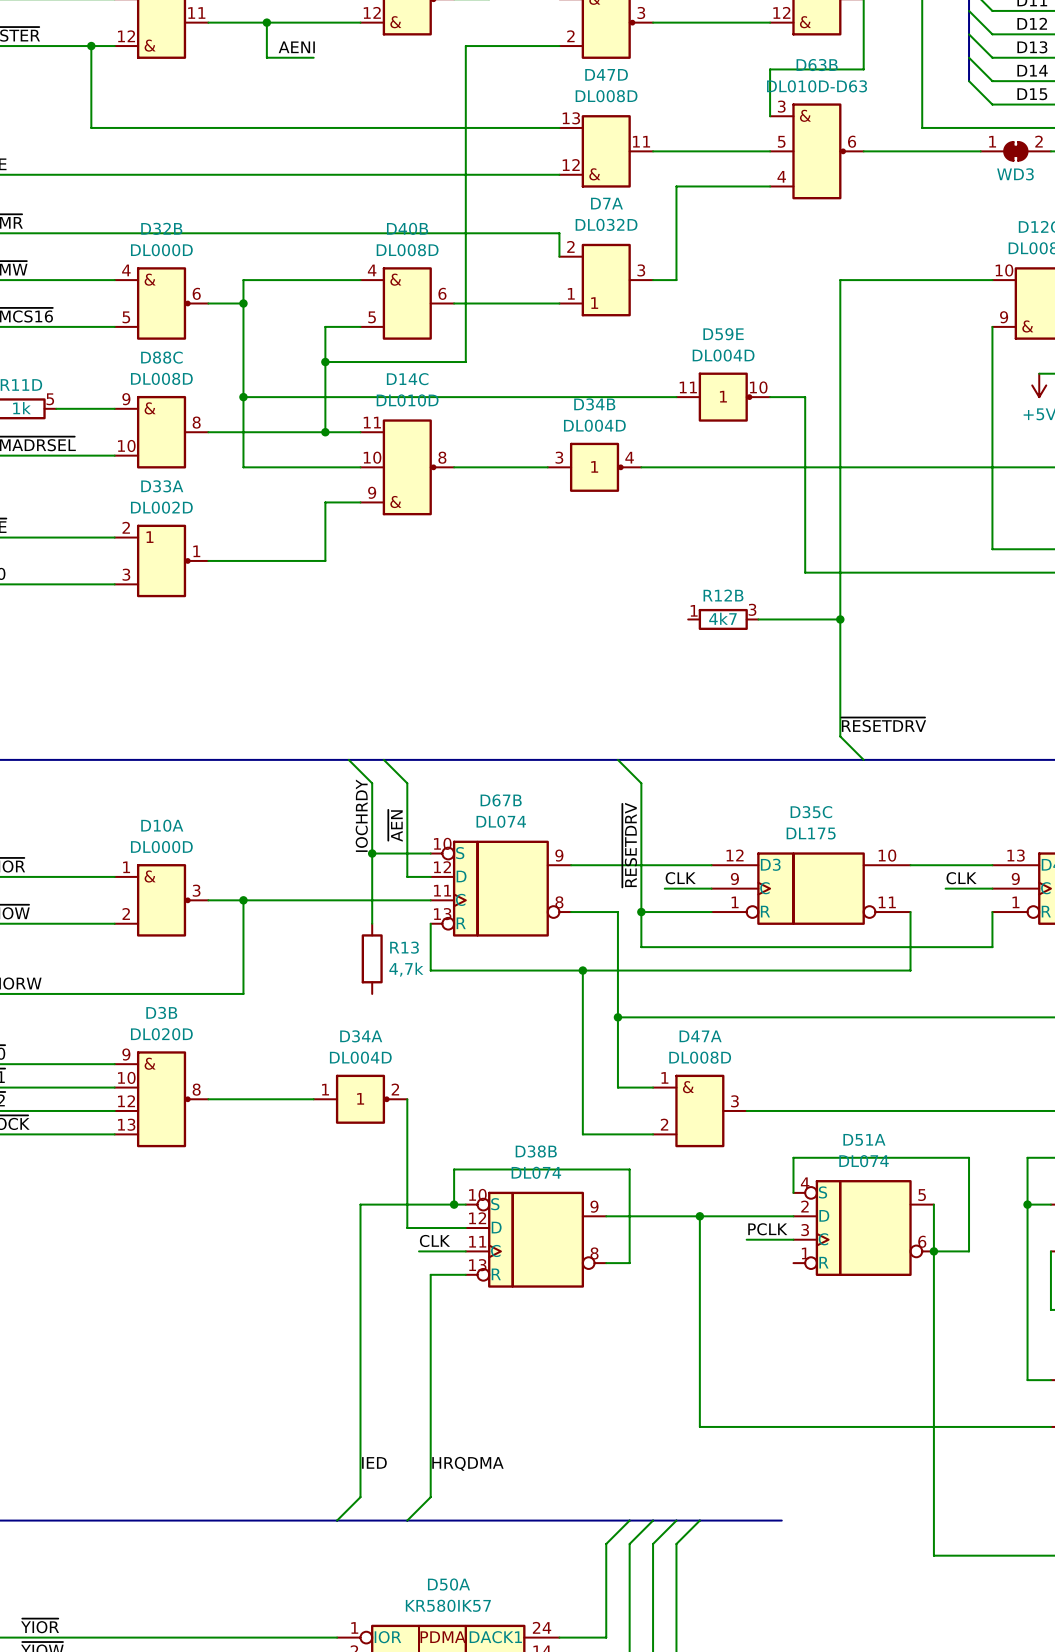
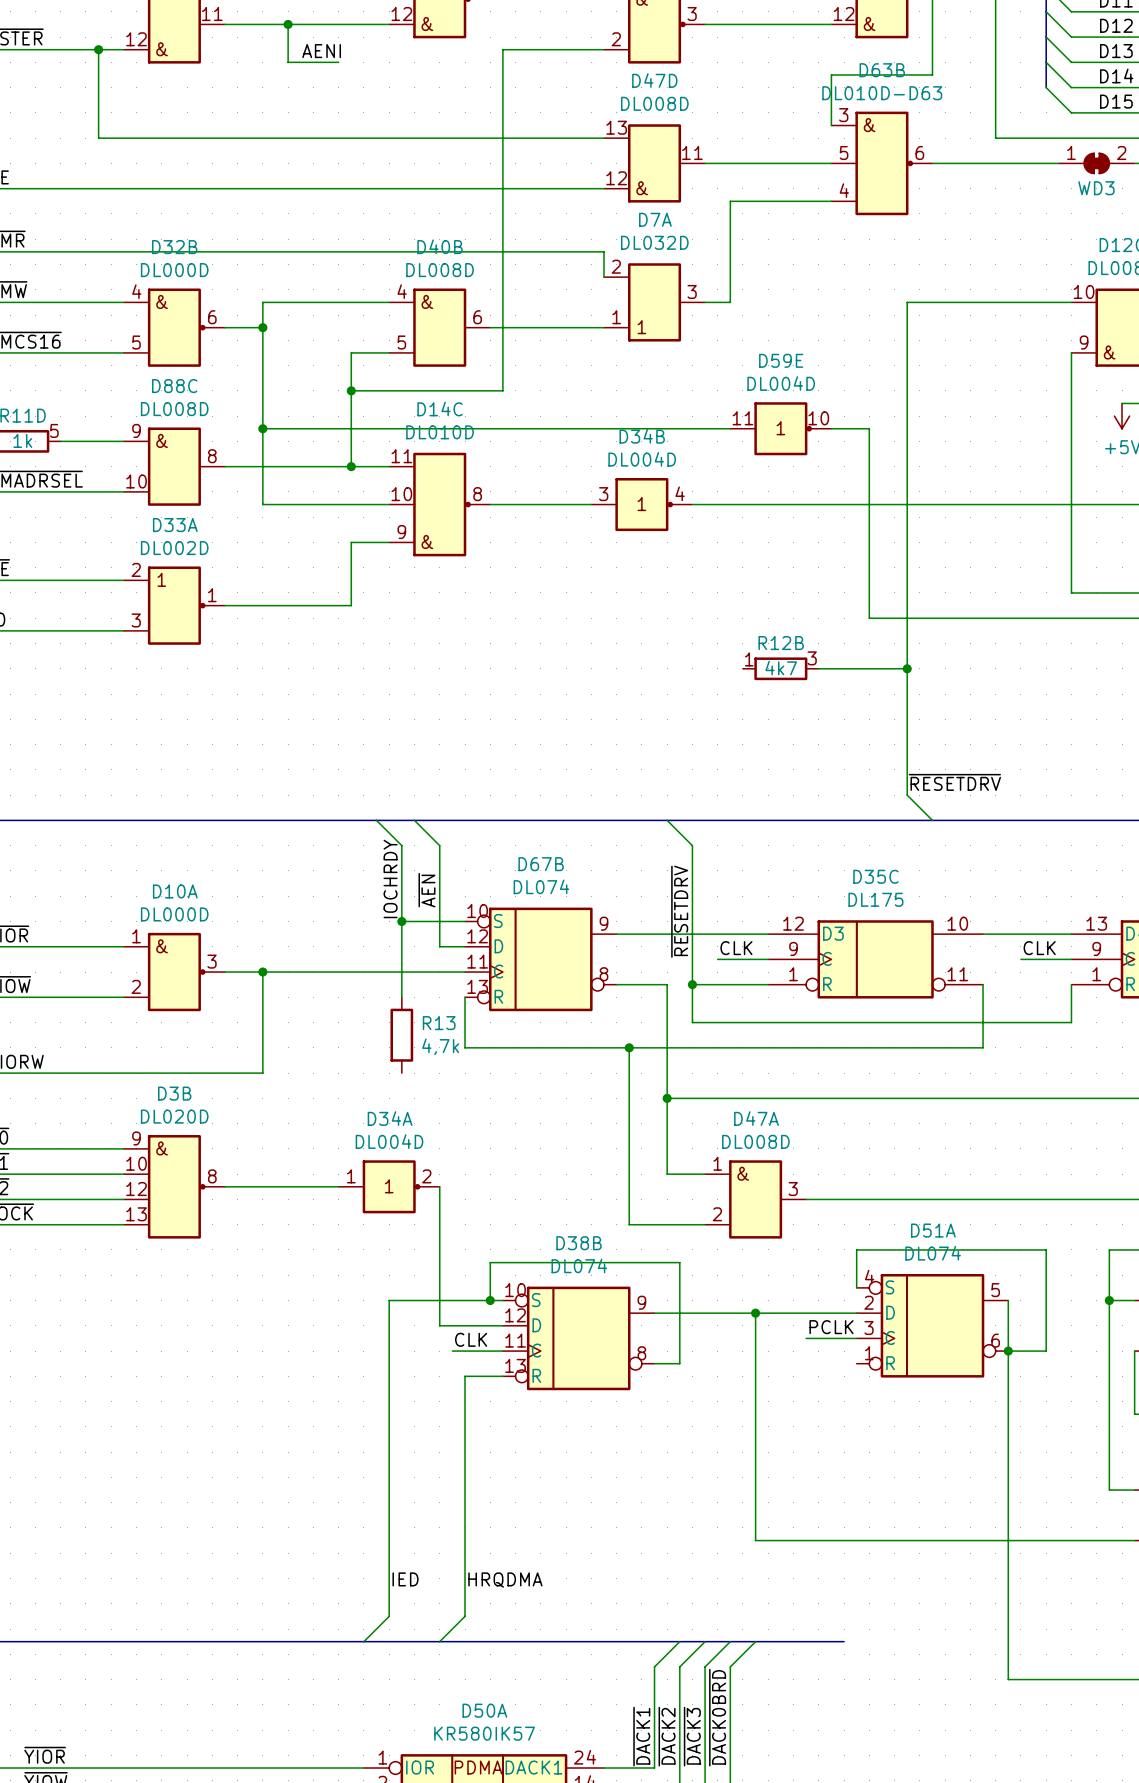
label: none -> ~{DACK0BRD} (717, 1717)
label: none -> ~{DACK1} (641, 1736)
label: none -> ~{DACK2} (667, 1736)
label: none -> ~{DACK3} (692, 1736)

